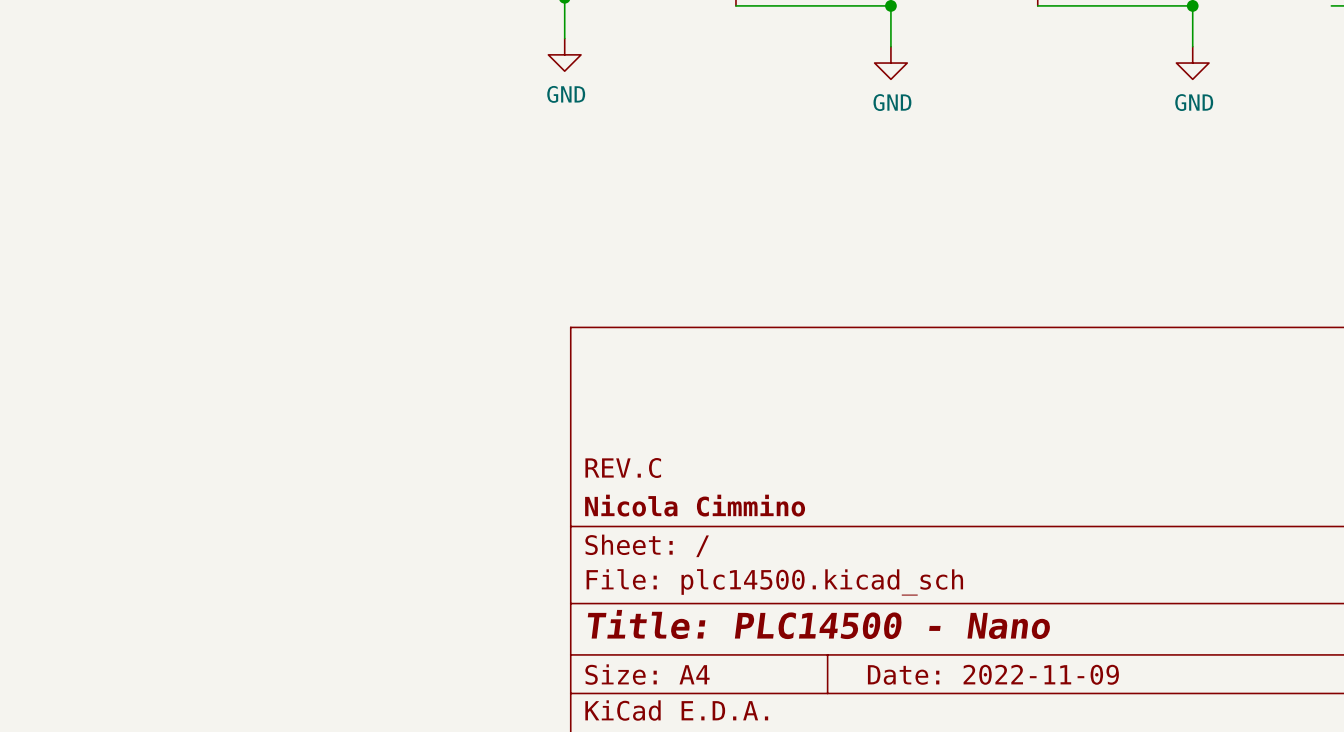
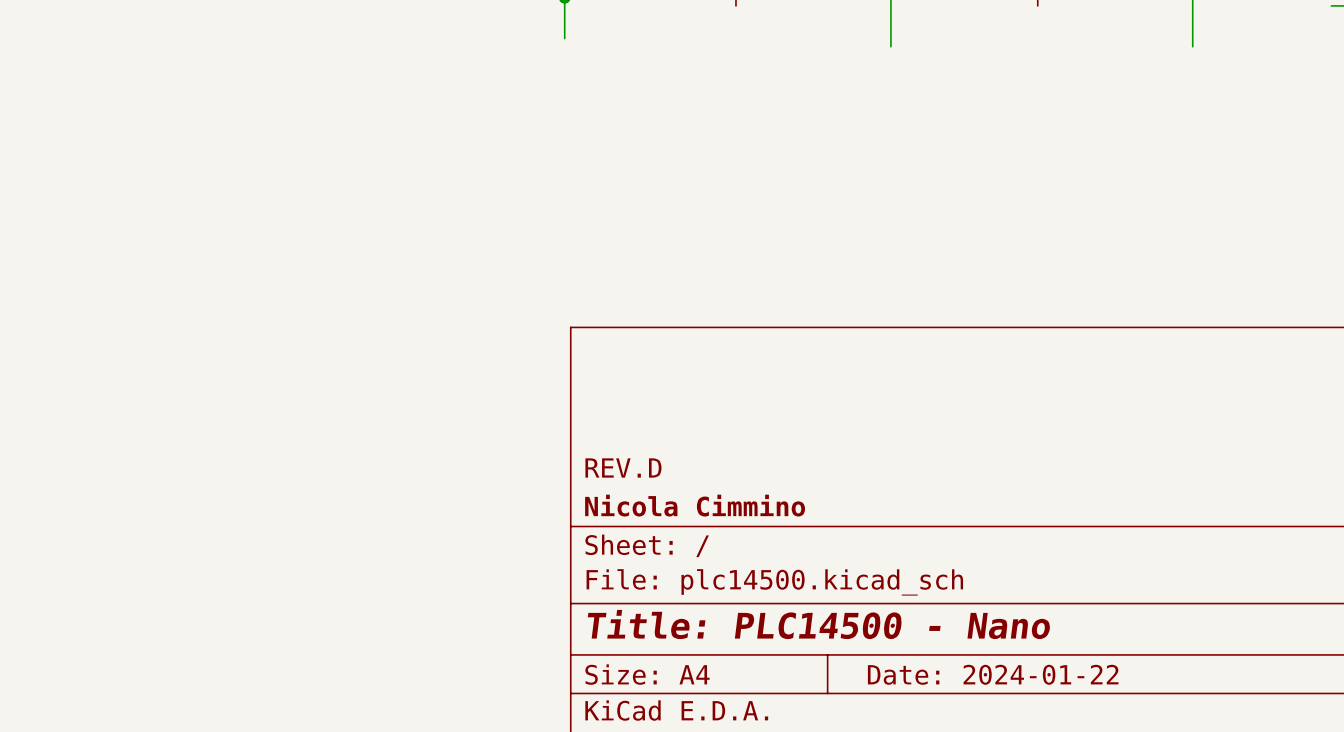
wire: (735, 5) (890, 5) -> none
junction: (890, 5) -> none
wire: (1037, 5) (1192, 5) -> none
junction: (1192, 5) -> none
power symbol: GND (564, 54) -> none
power symbol: GND (890, 63) -> none
power symbol: GND (1192, 63) -> none
title block: REV.C (623, 468) -> REV.D (623, 467)
title block: Date: 2022-11-09 (993, 674) -> Date: 2024-01-22 (993, 674)

